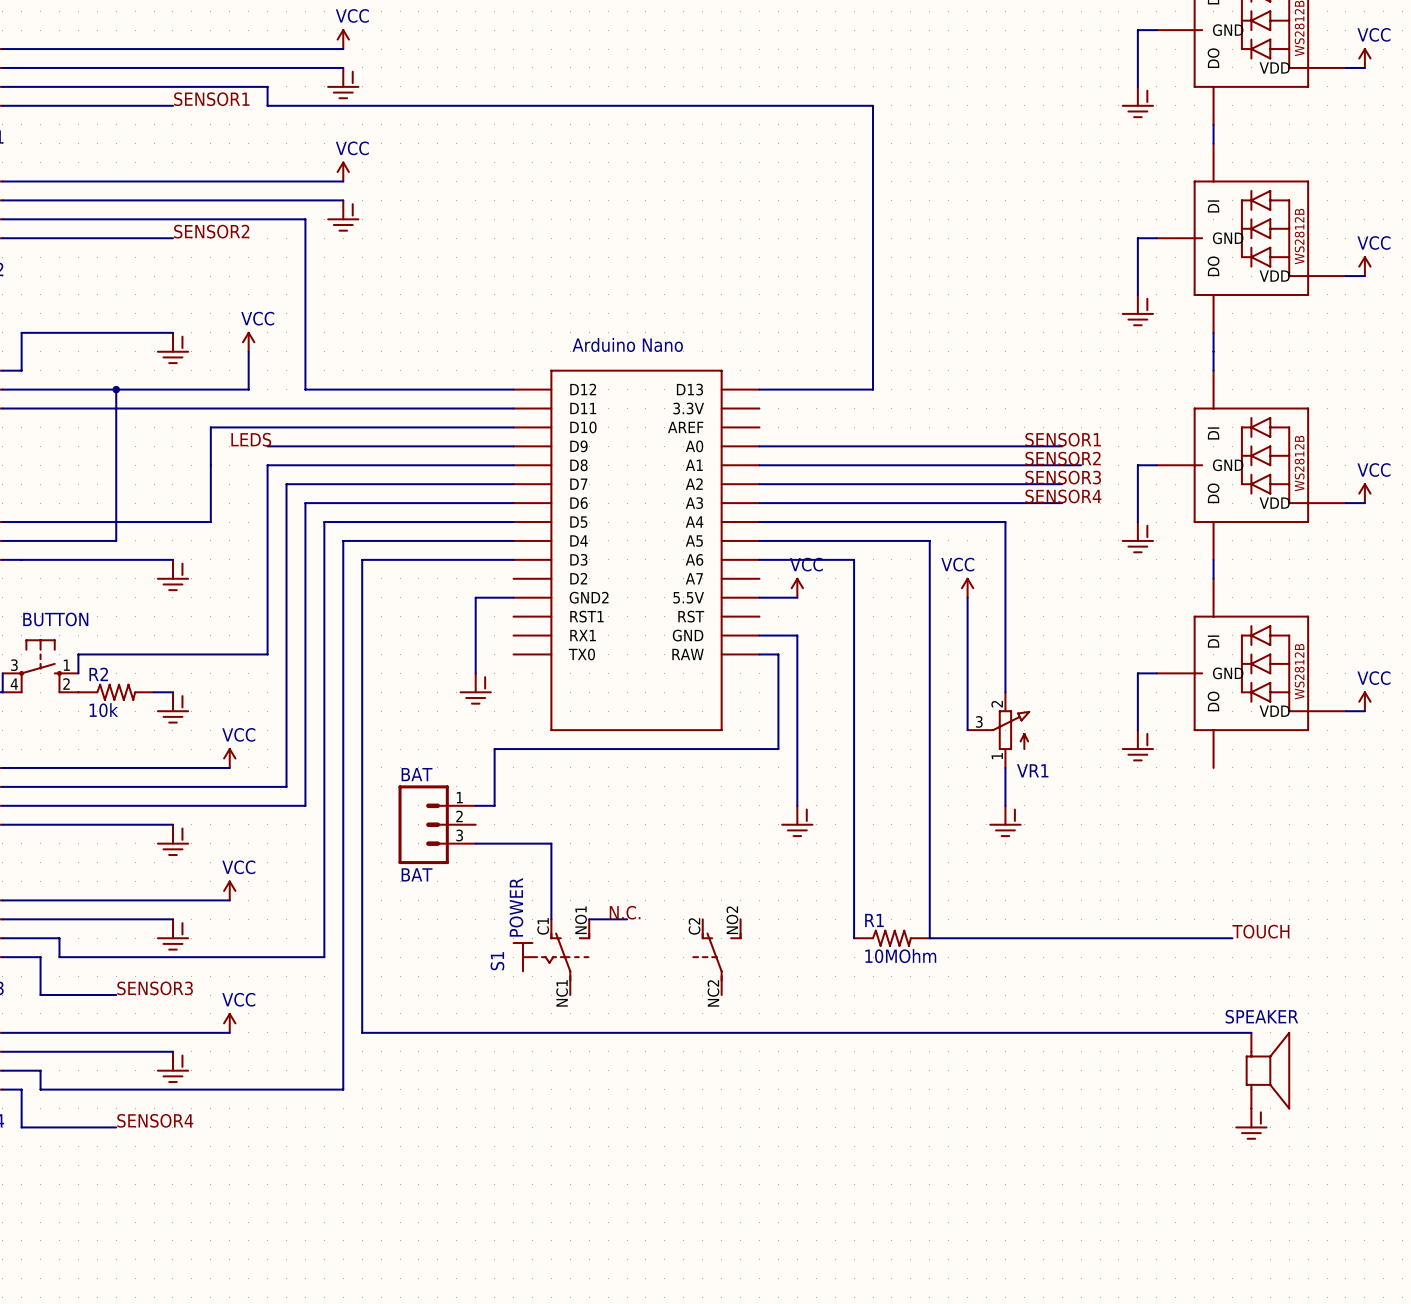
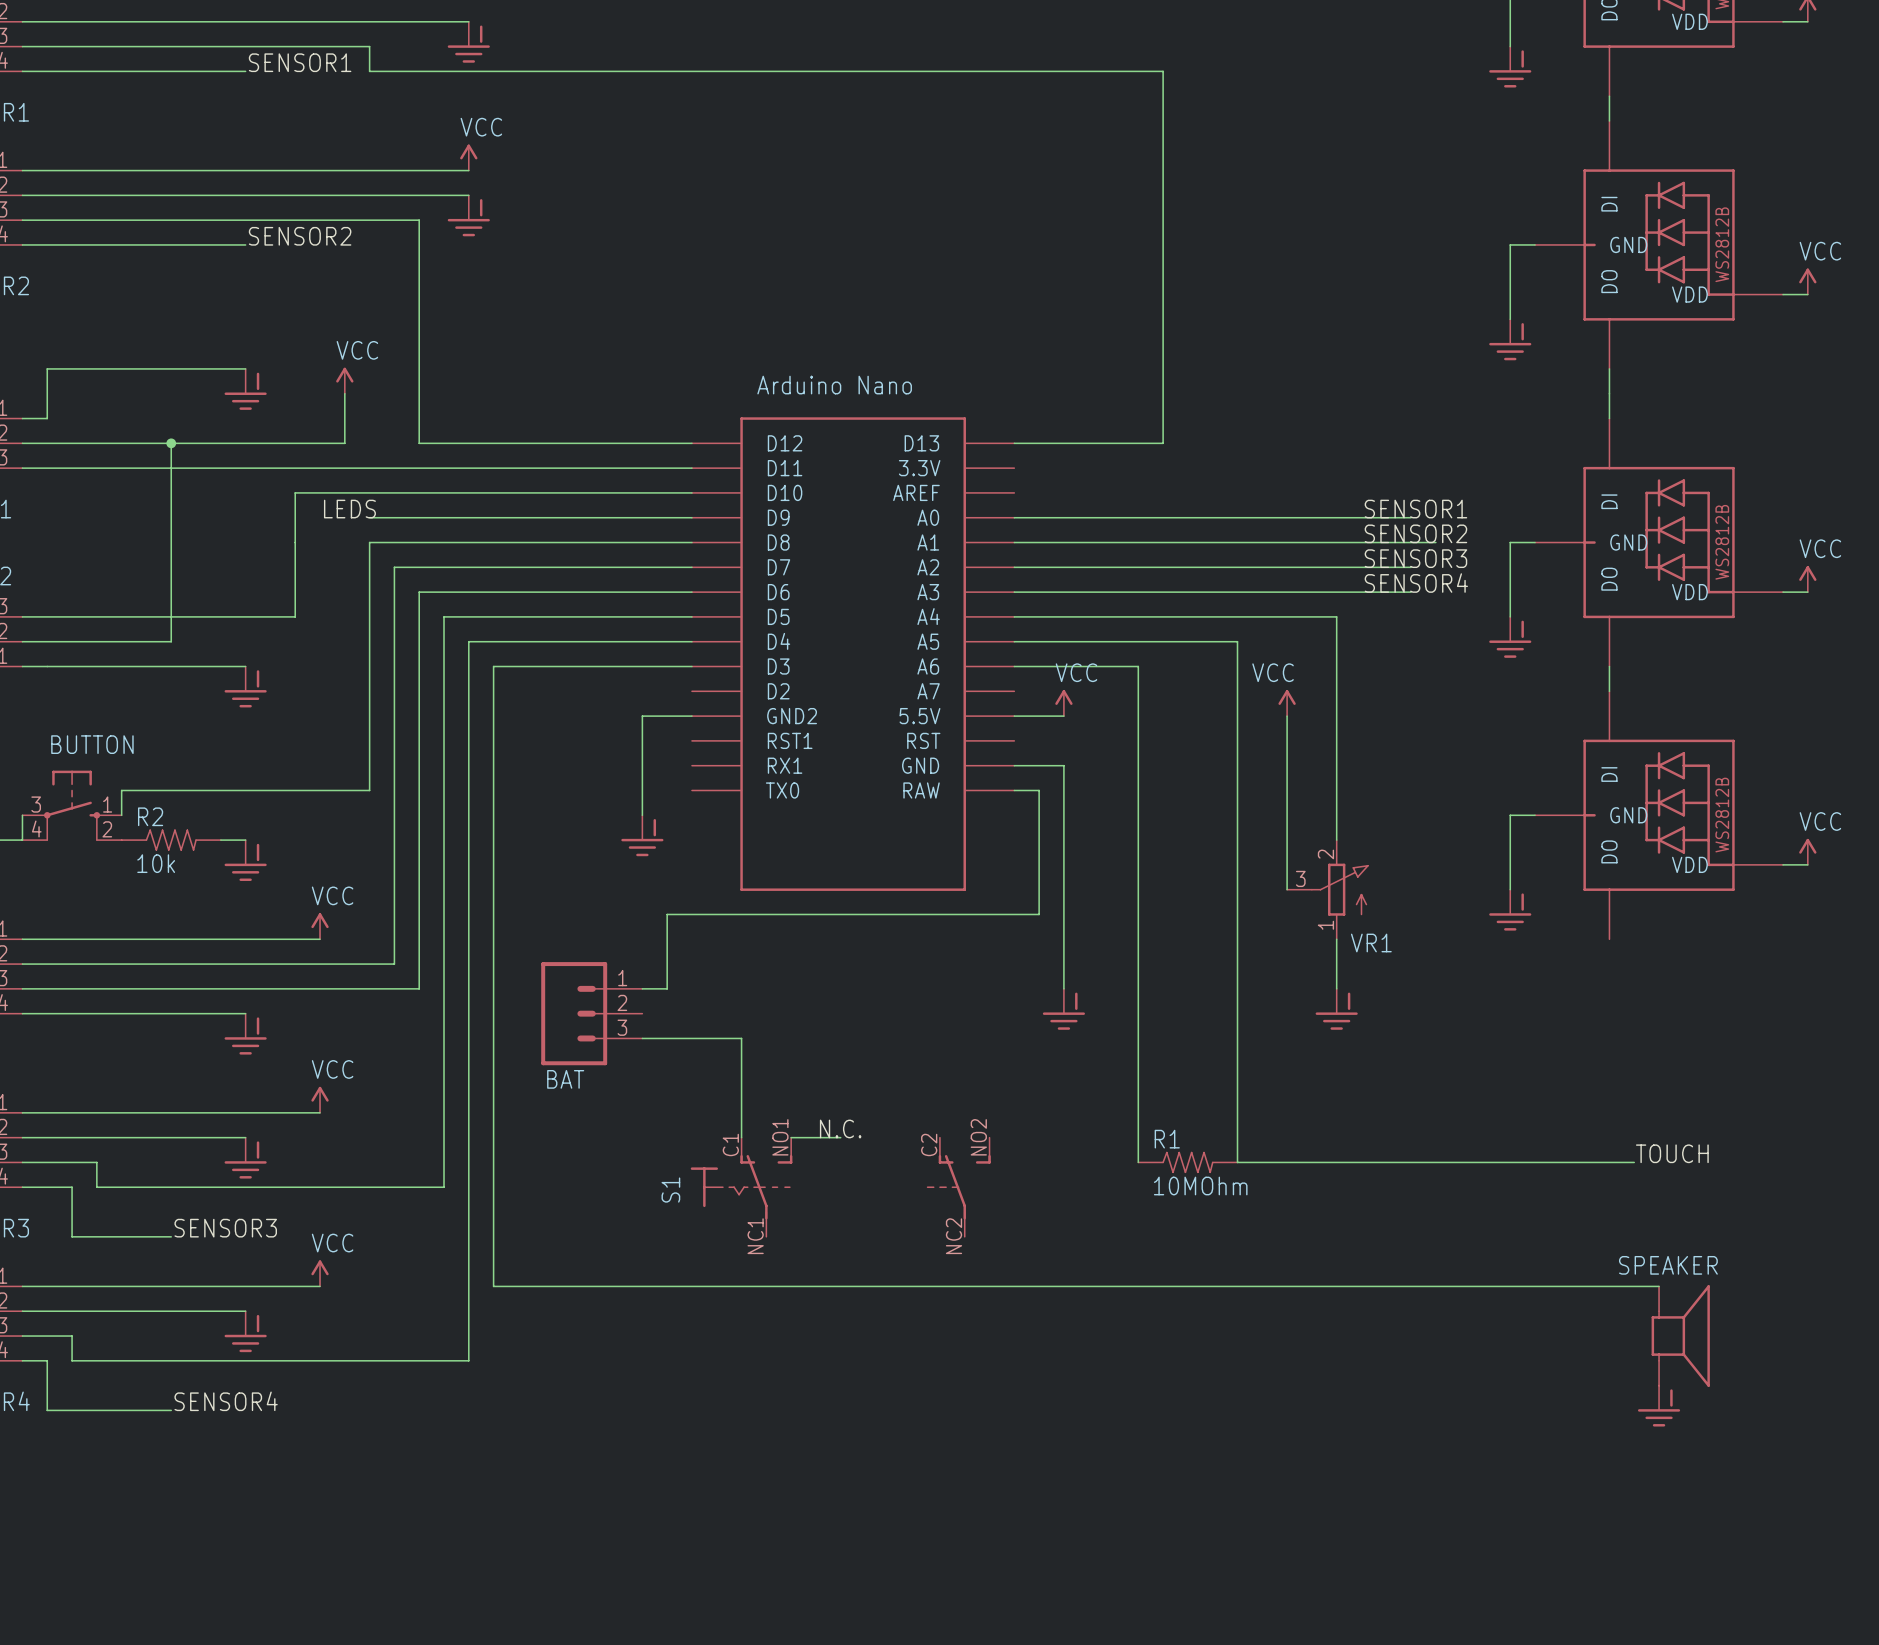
BAT value: BAT (417, 774) -> none
S1 value: POWER (516, 907) -> none

